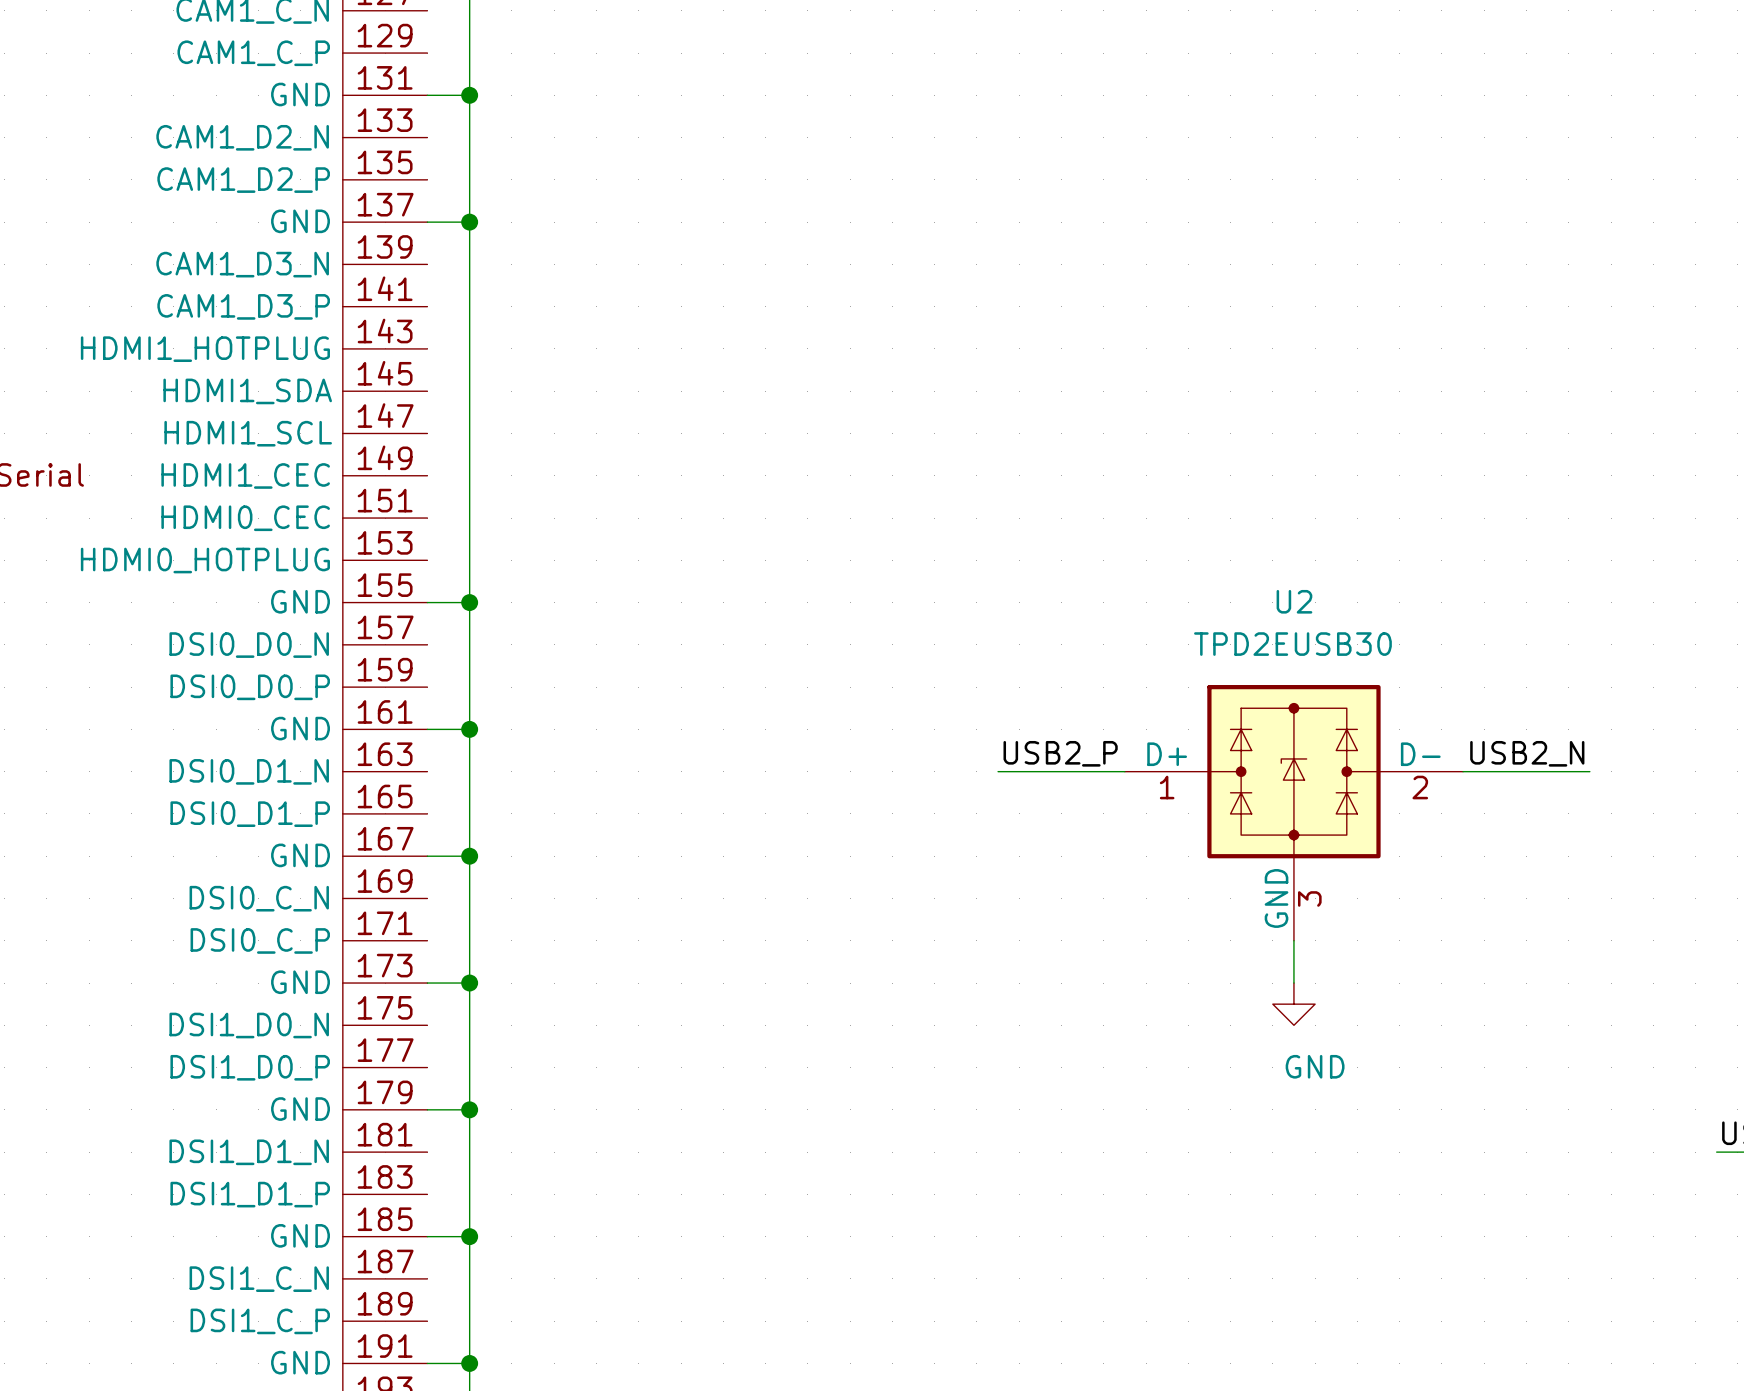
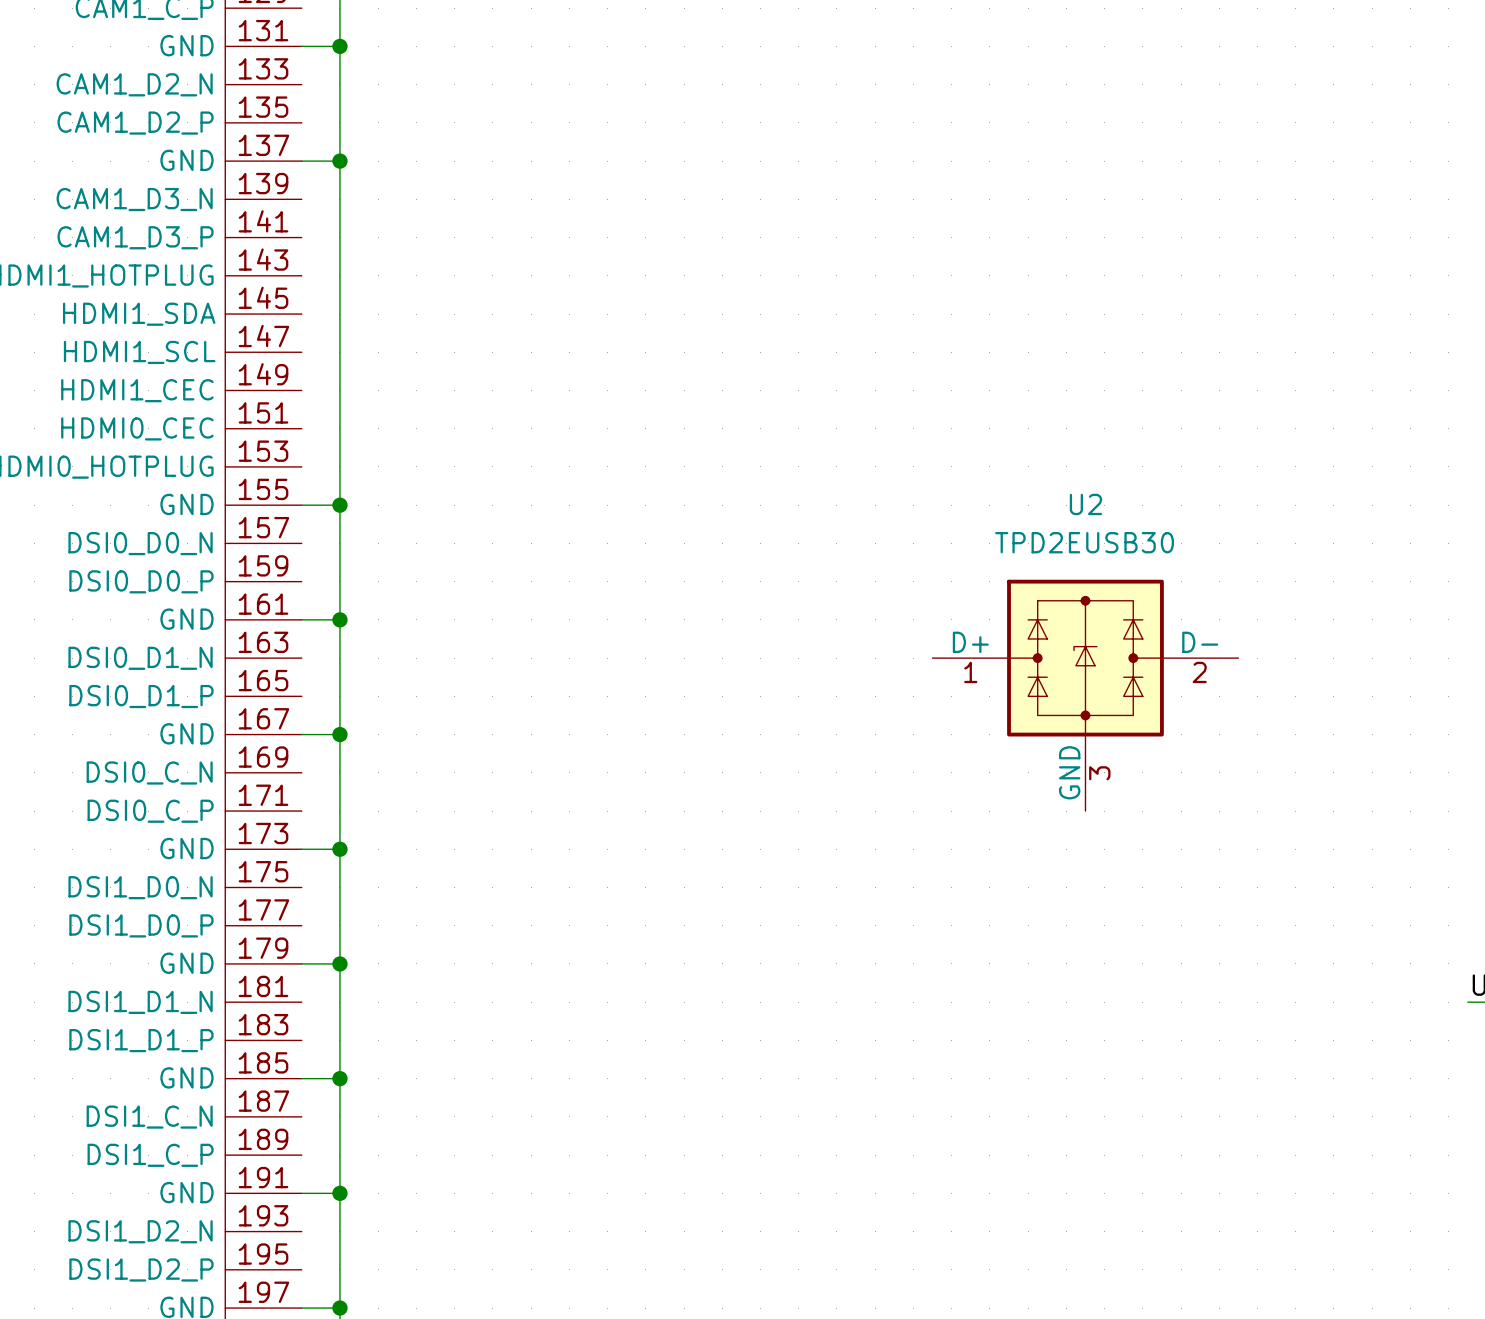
label: USB2_P (1060, 753) -> none
label: USB2_N (1527, 753) -> none
wire: (998, 771) (1124, 771) -> none
wire: (1463, 771) (1589, 771) -> none
wire: (1293, 940) (1293, 983) -> none
power symbol: GND (1293, 1004) -> none

